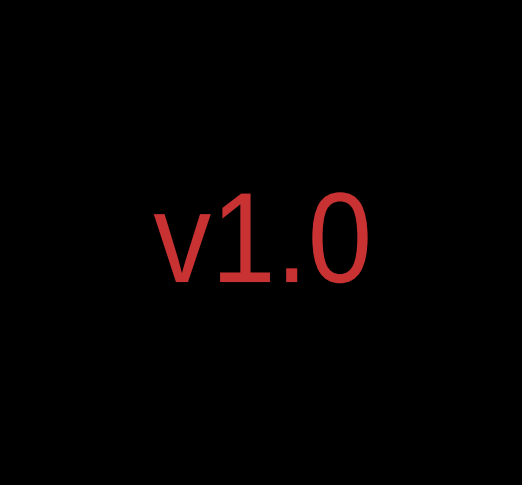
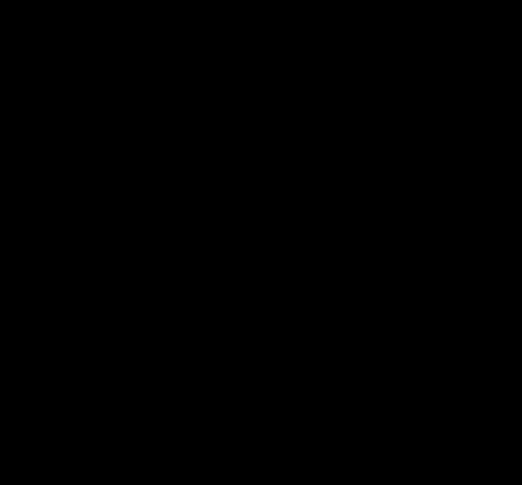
text: v1.0 (260, 237) -> none

